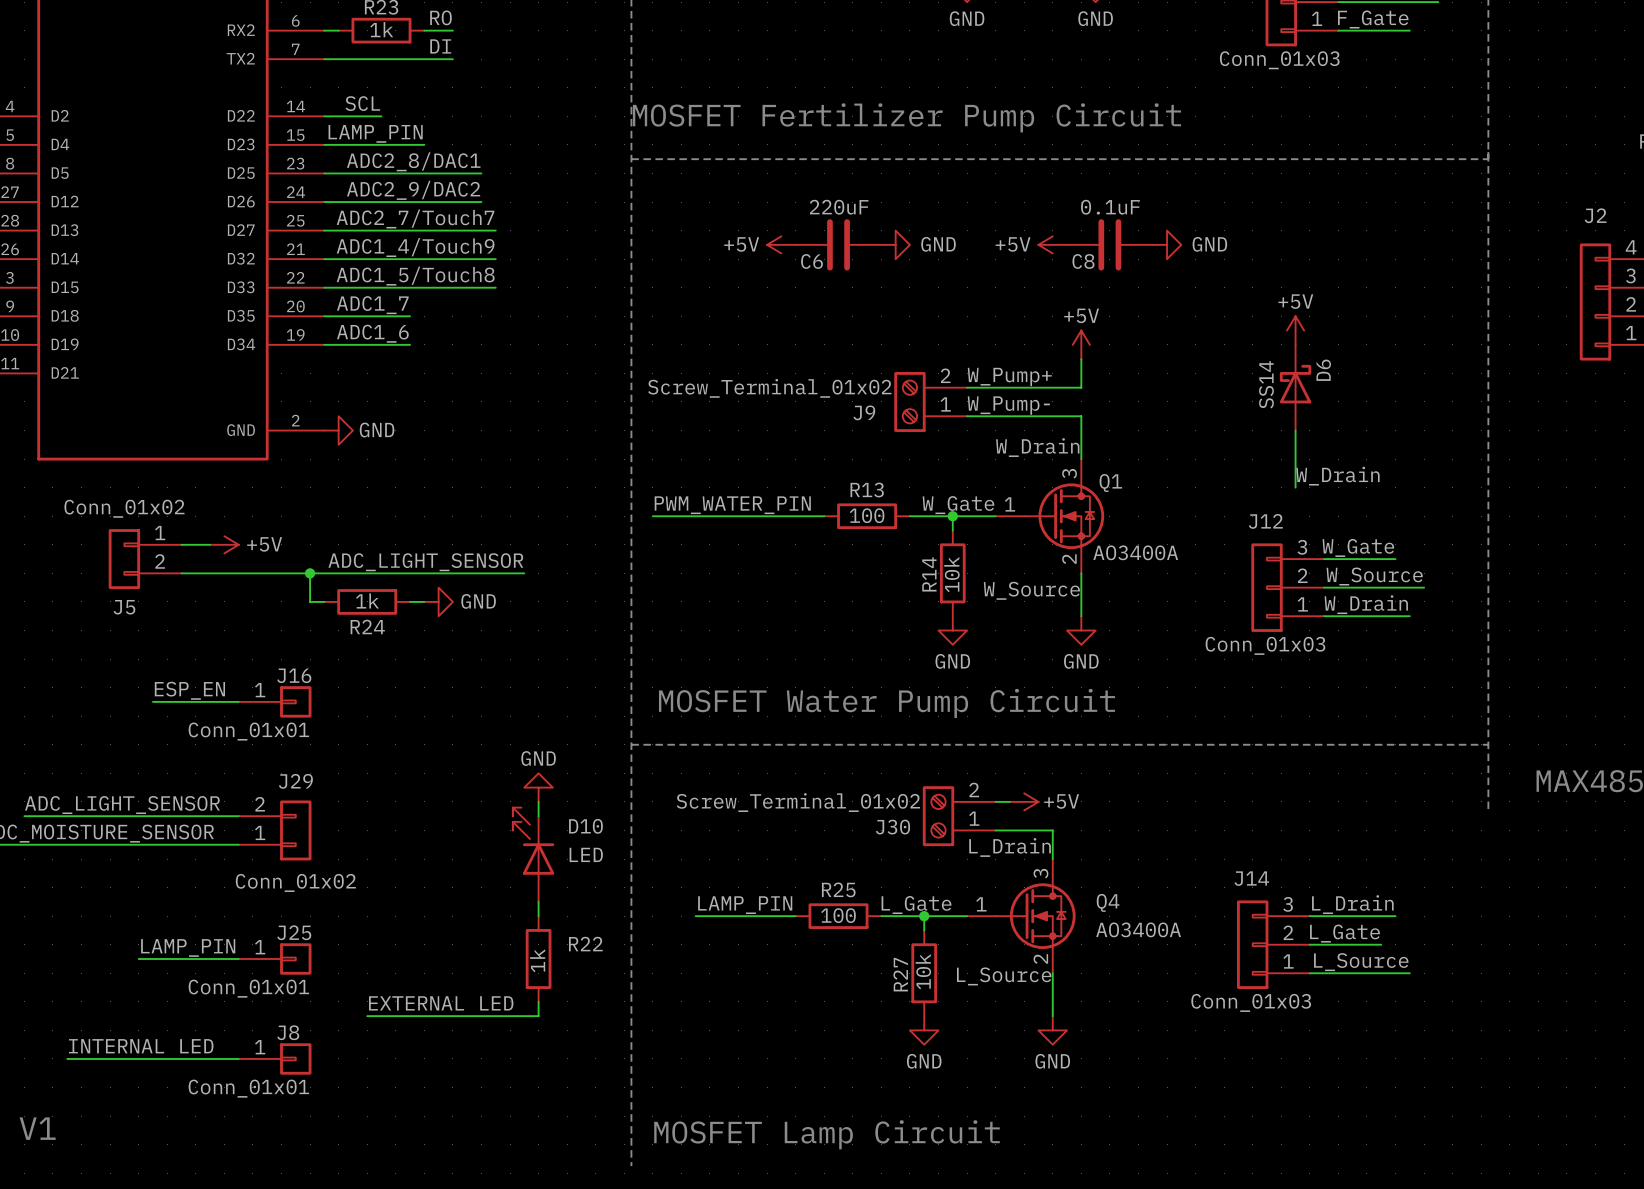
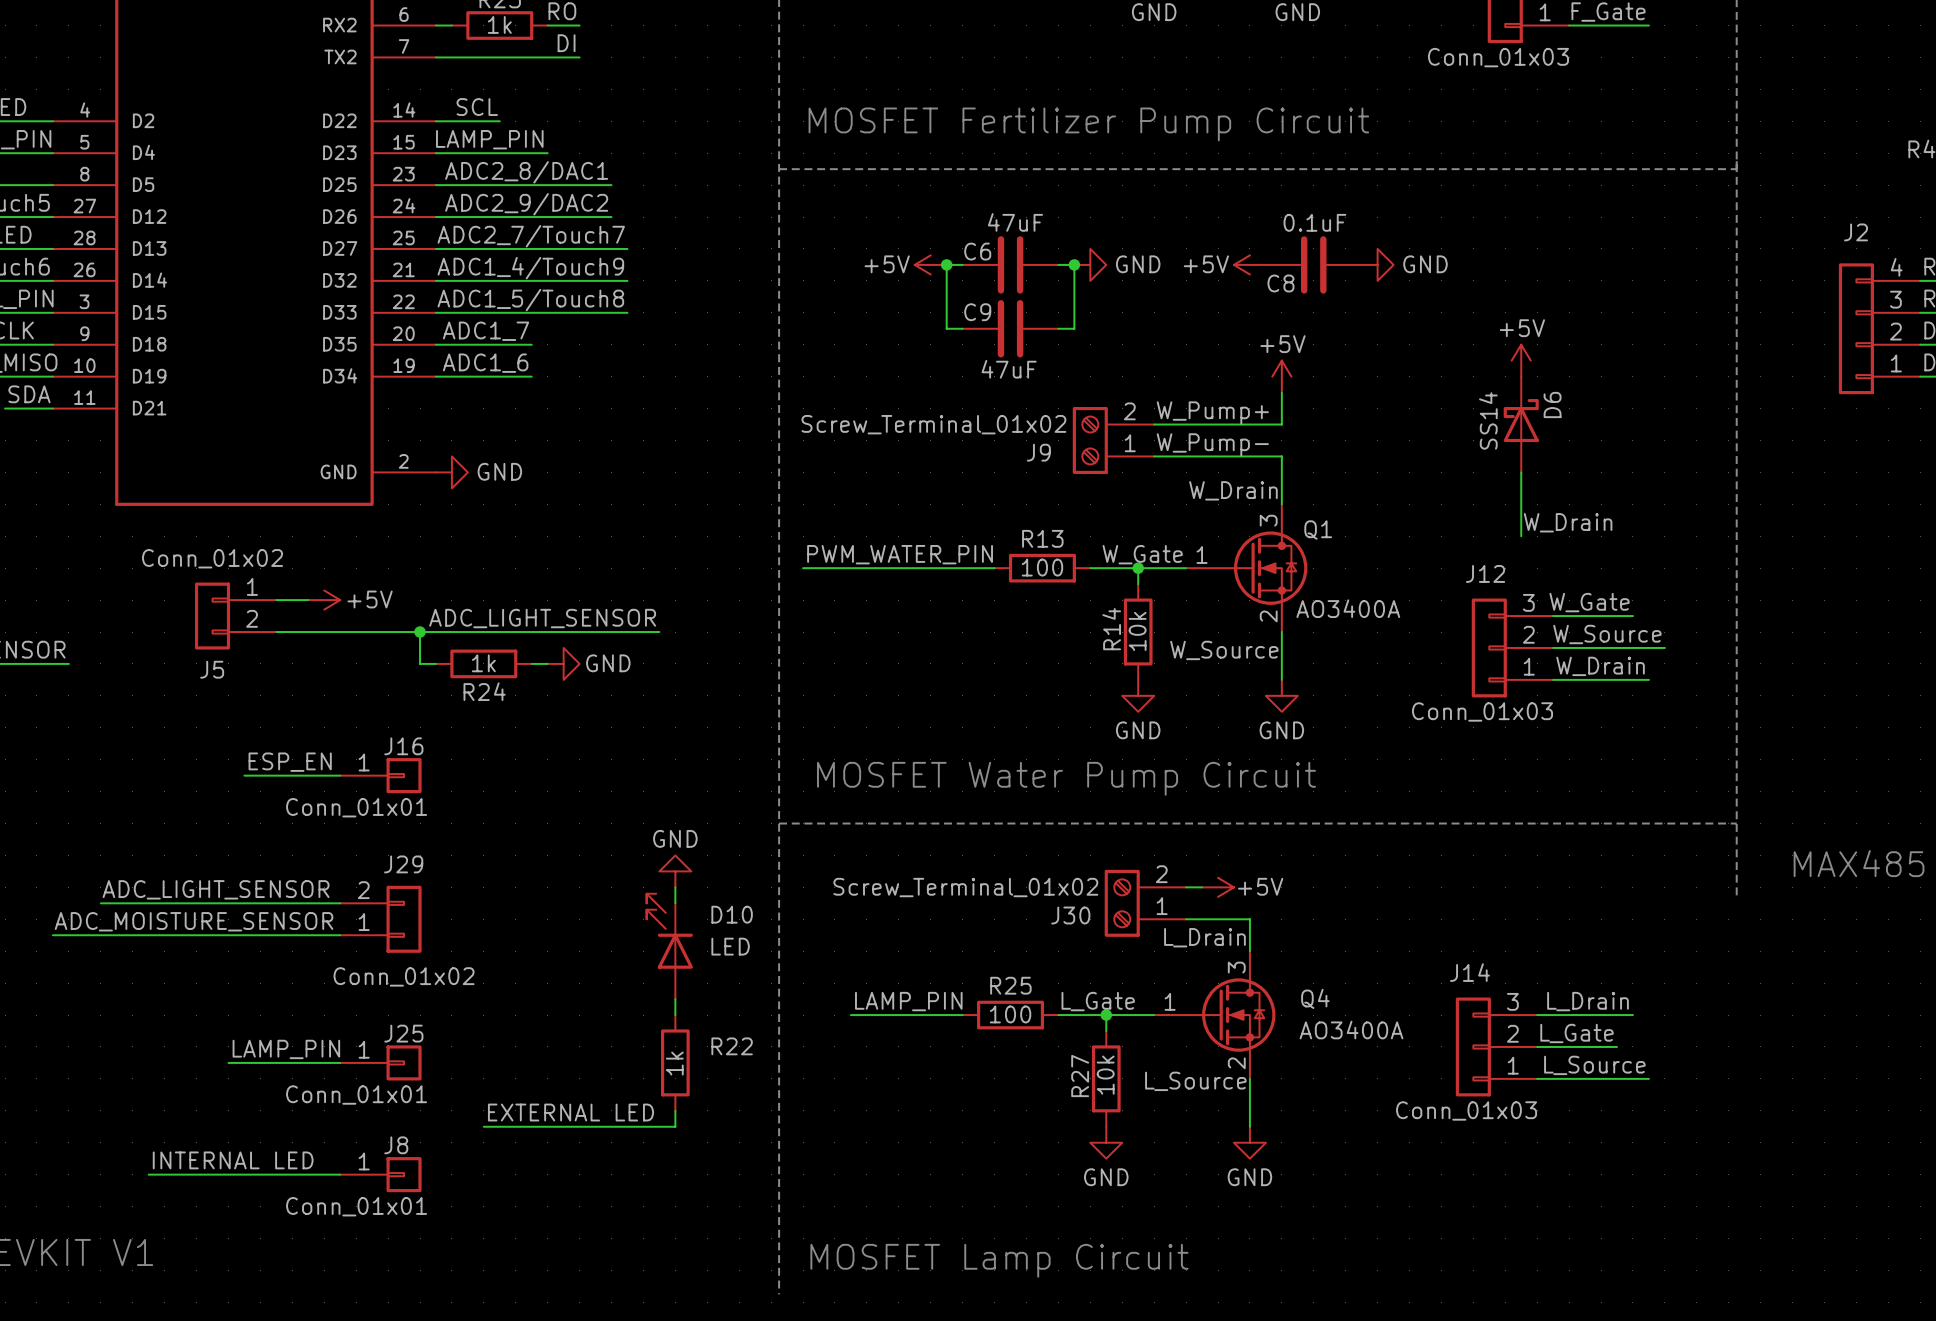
C6 value: 220uF (839, 207) -> 47uF (1015, 222)
power symbol position: +5V (781, 244) -> +5V (930, 264)
junction: none -> (946, 264)
wire: none -> (962, 264) (946, 264) (946, 328) (962, 328)
wire: none -> (1058, 264) (1074, 264) (1074, 328) (1058, 328)
power symbol position: GND (895, 244) -> GND (1090, 264)
junction: none -> (1074, 264)
C6 name position: C6 (812, 261) -> C6 (977, 251)
C9: none -> 47uF (1010, 328)

